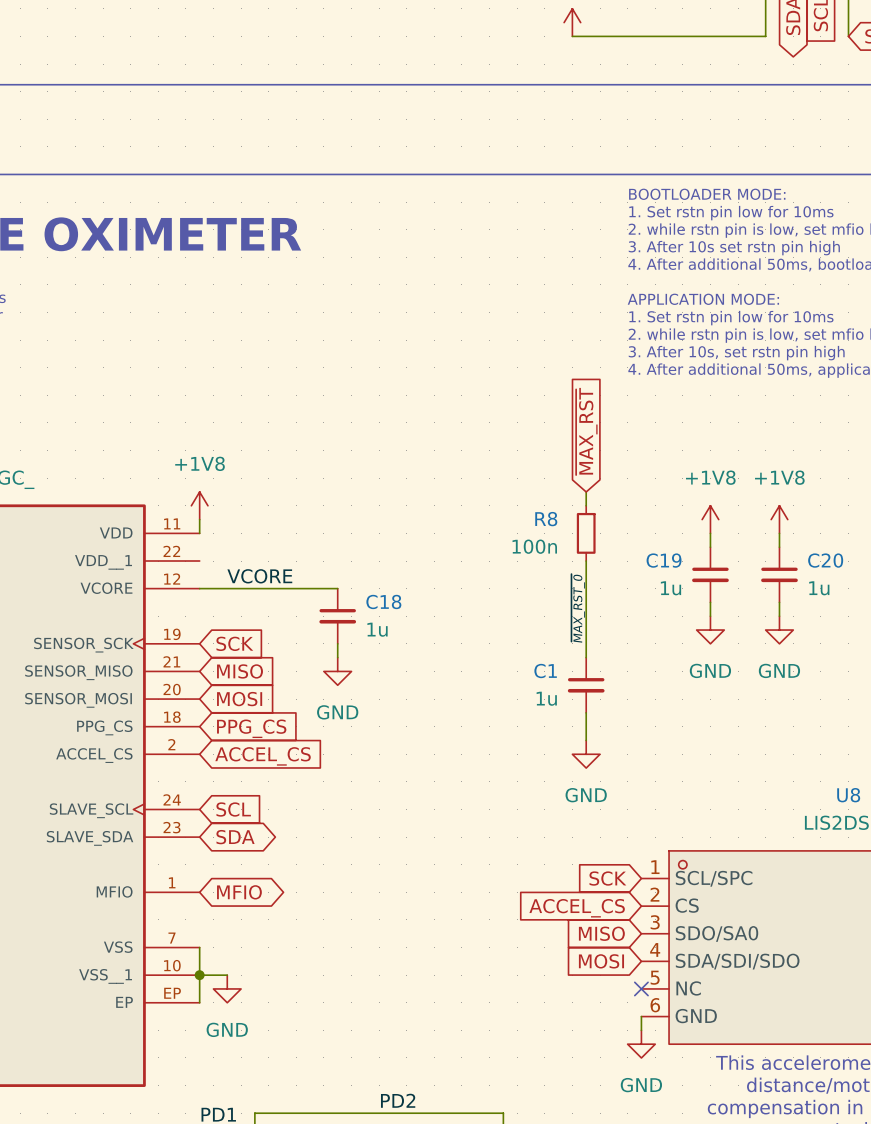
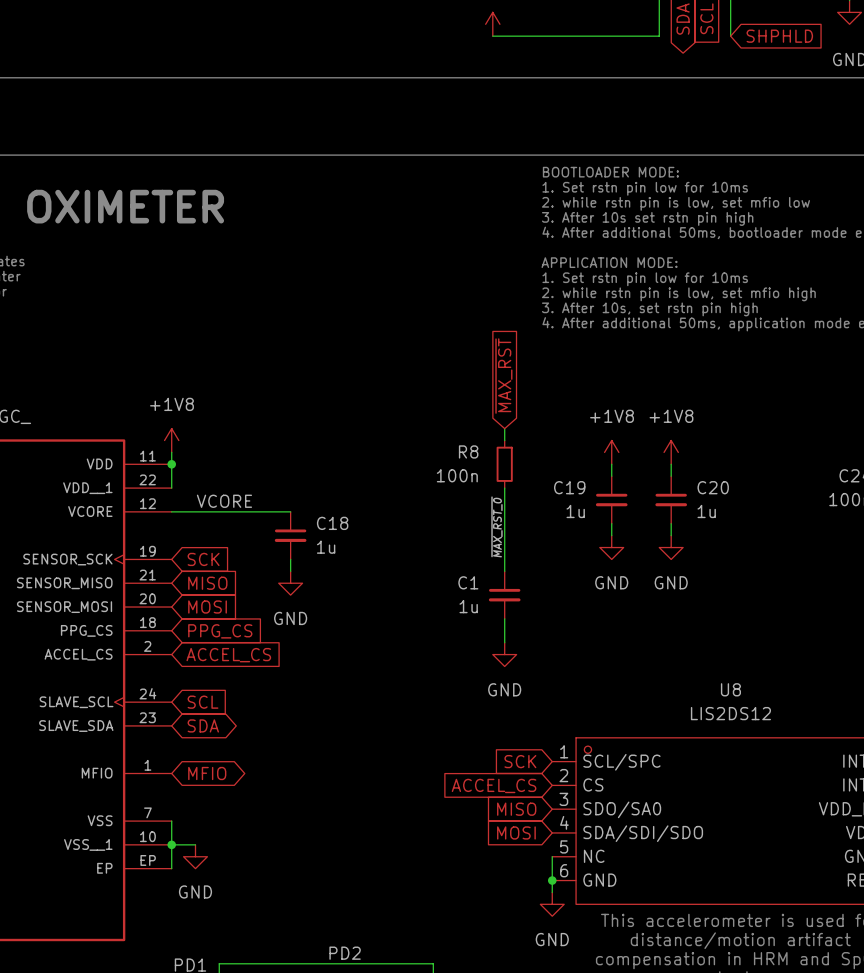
wire: none -> (171, 464) (171, 488)
junction: none -> (171, 464)
wire: none -> (552, 856) (552, 880)
no-connect mark: (641, 988) -> none
junction: none -> (552, 880)

